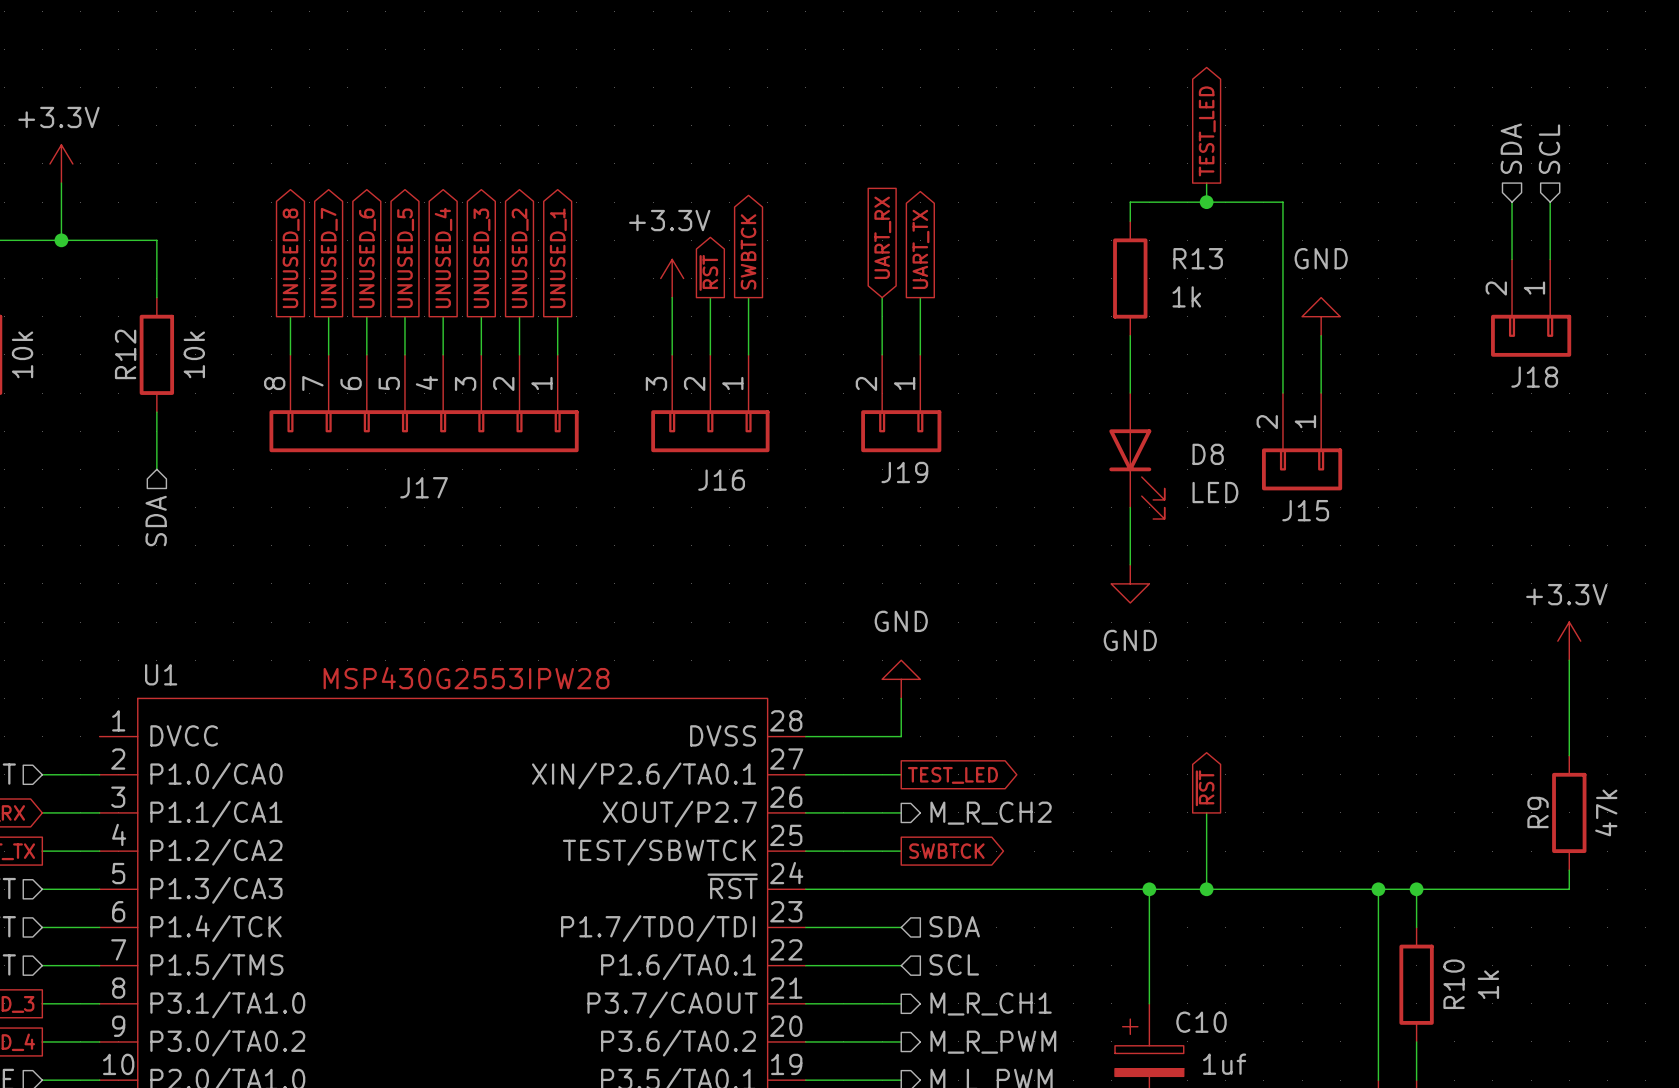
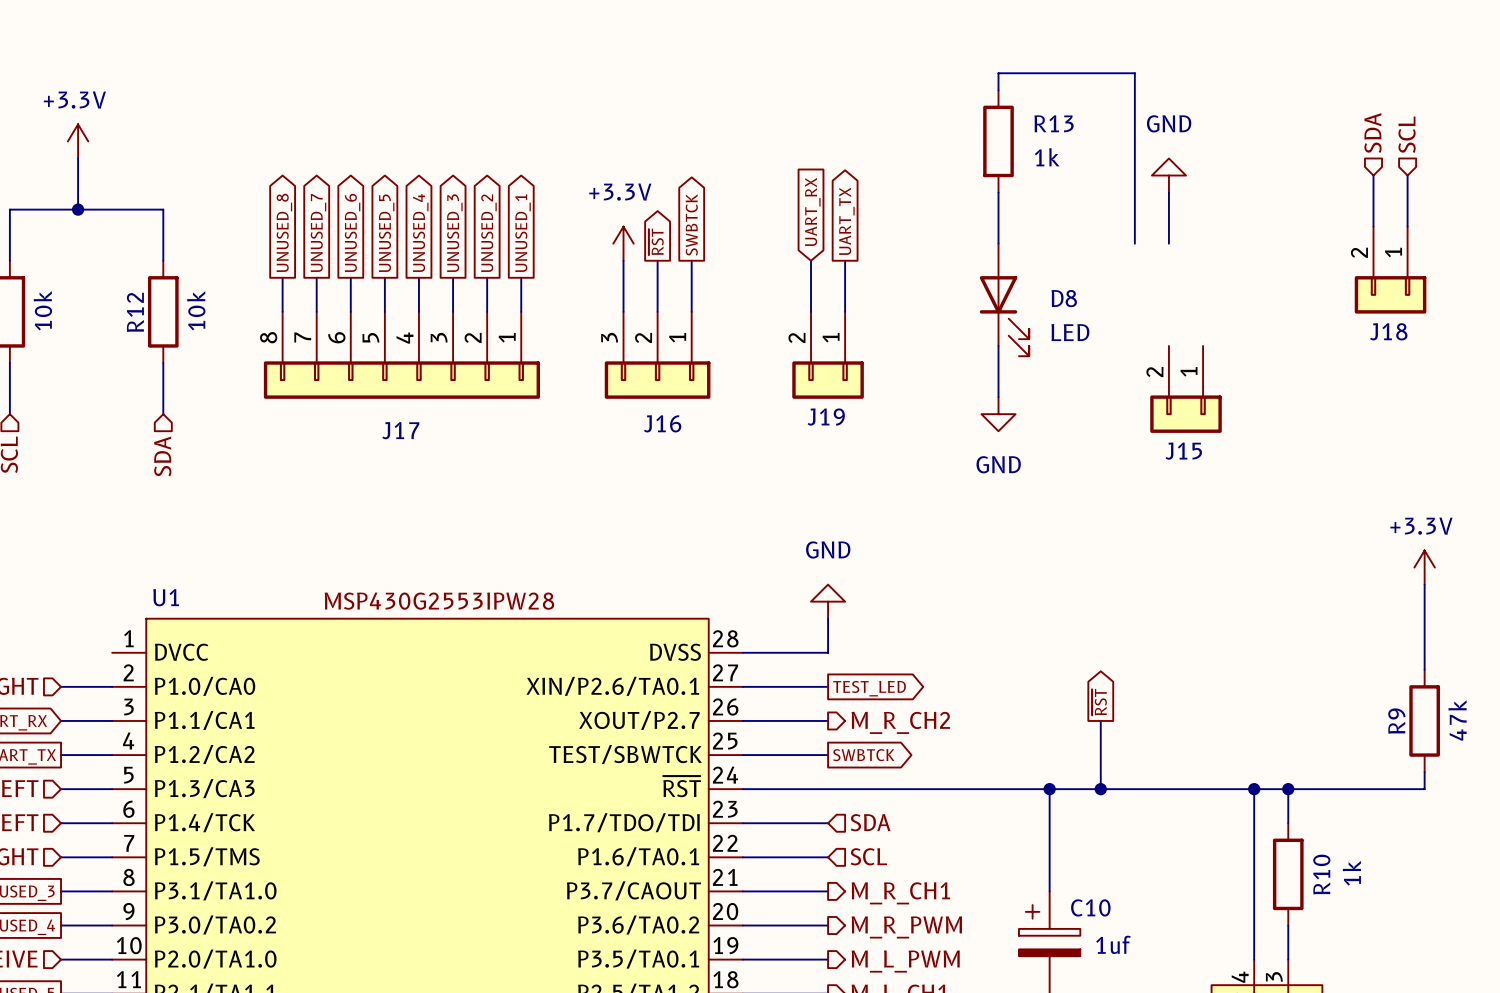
wire: none -> (998, 90) (998, 73) (1134, 73) (1134, 243)
global label: TEST_LED (1207, 131) -> none
wire: (1206, 183) (1206, 202) -> none
junction: (1206, 202) -> none
wire: (1130, 221) (1130, 202) (1282, 202) (1282, 221) -> none
R13 position: (1130, 278) -> (998, 141)
wire: (1282, 278) (1282, 393) -> none
power symbol position: GND (1321, 316) -> GND (1168, 175)
wire: (1130, 335) (1130, 393) -> (998, 192) (998, 243)
wire: (1321, 335) (1321, 393) -> none
D8 position: (1136, 456) -> (1004, 299)
wire: (1130, 507) (1130, 564) -> (998, 345) (998, 397)
power symbol position: GND (1130, 583) -> GND (998, 414)

